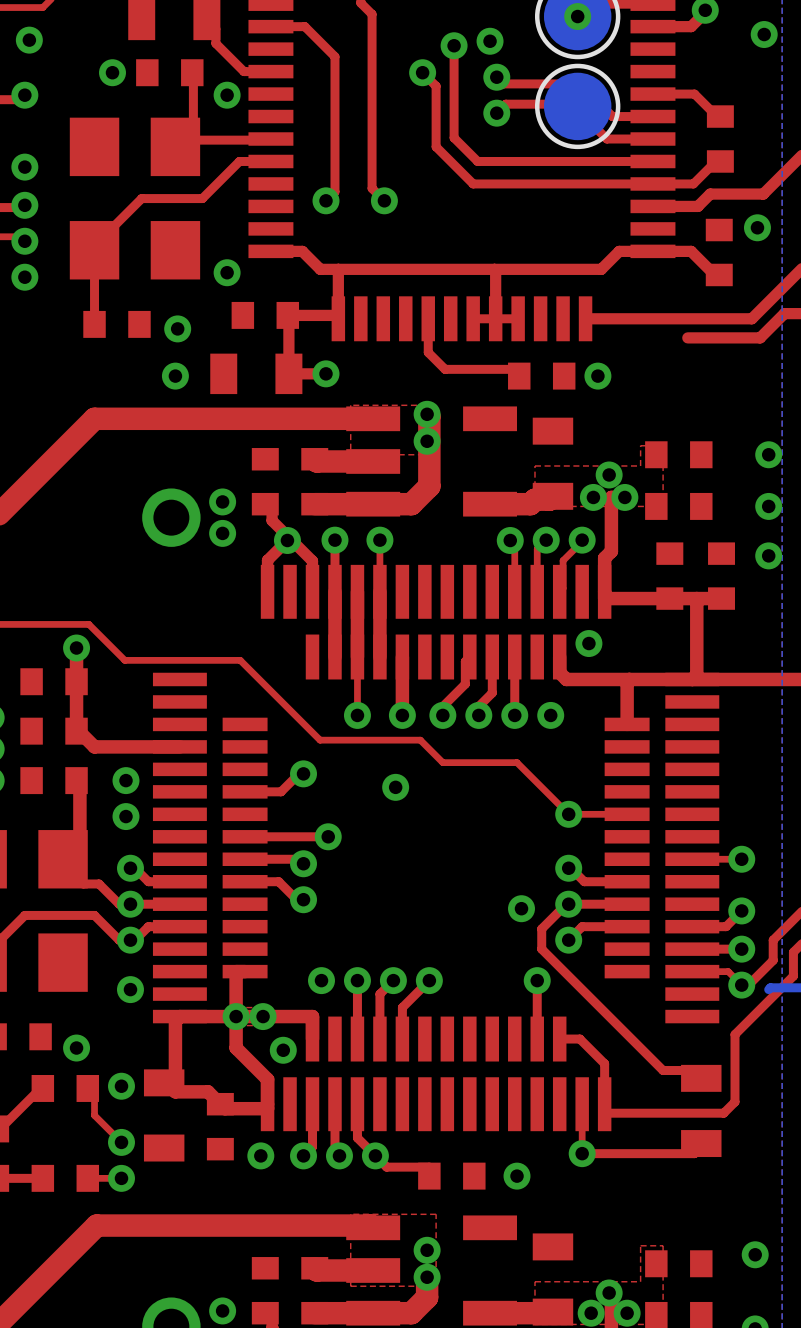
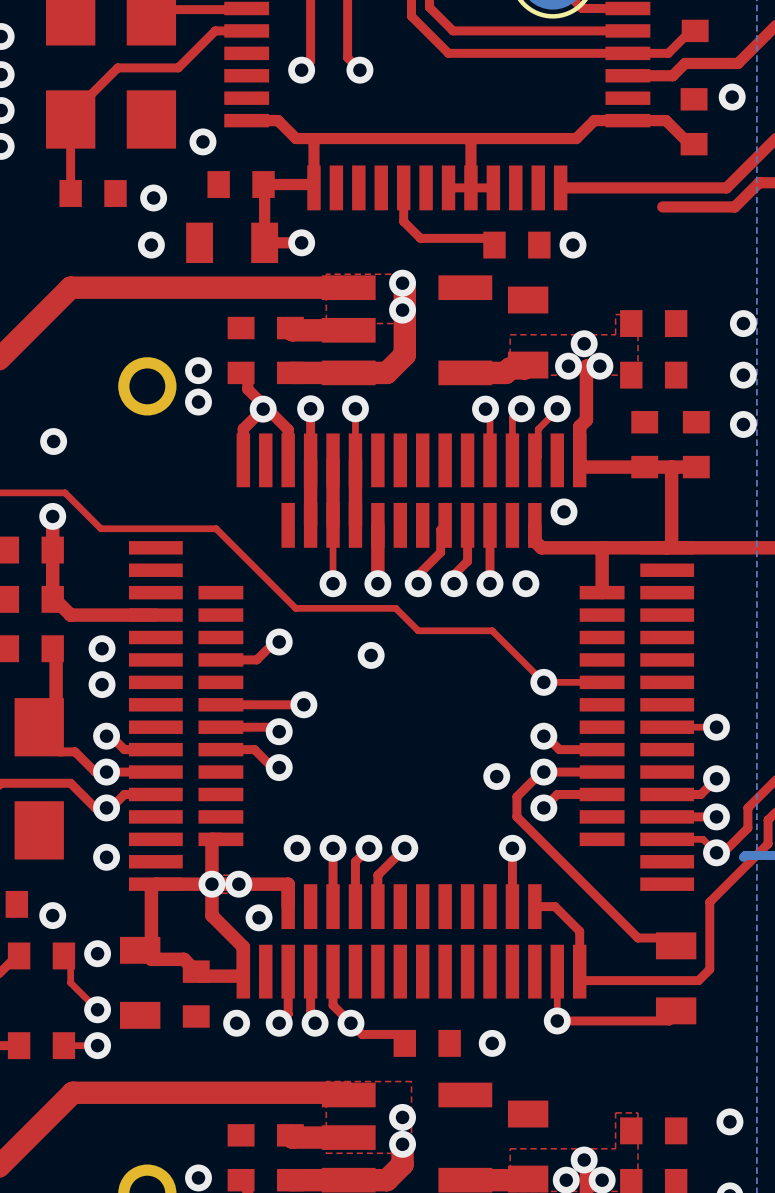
via: none -> (53, 441)

